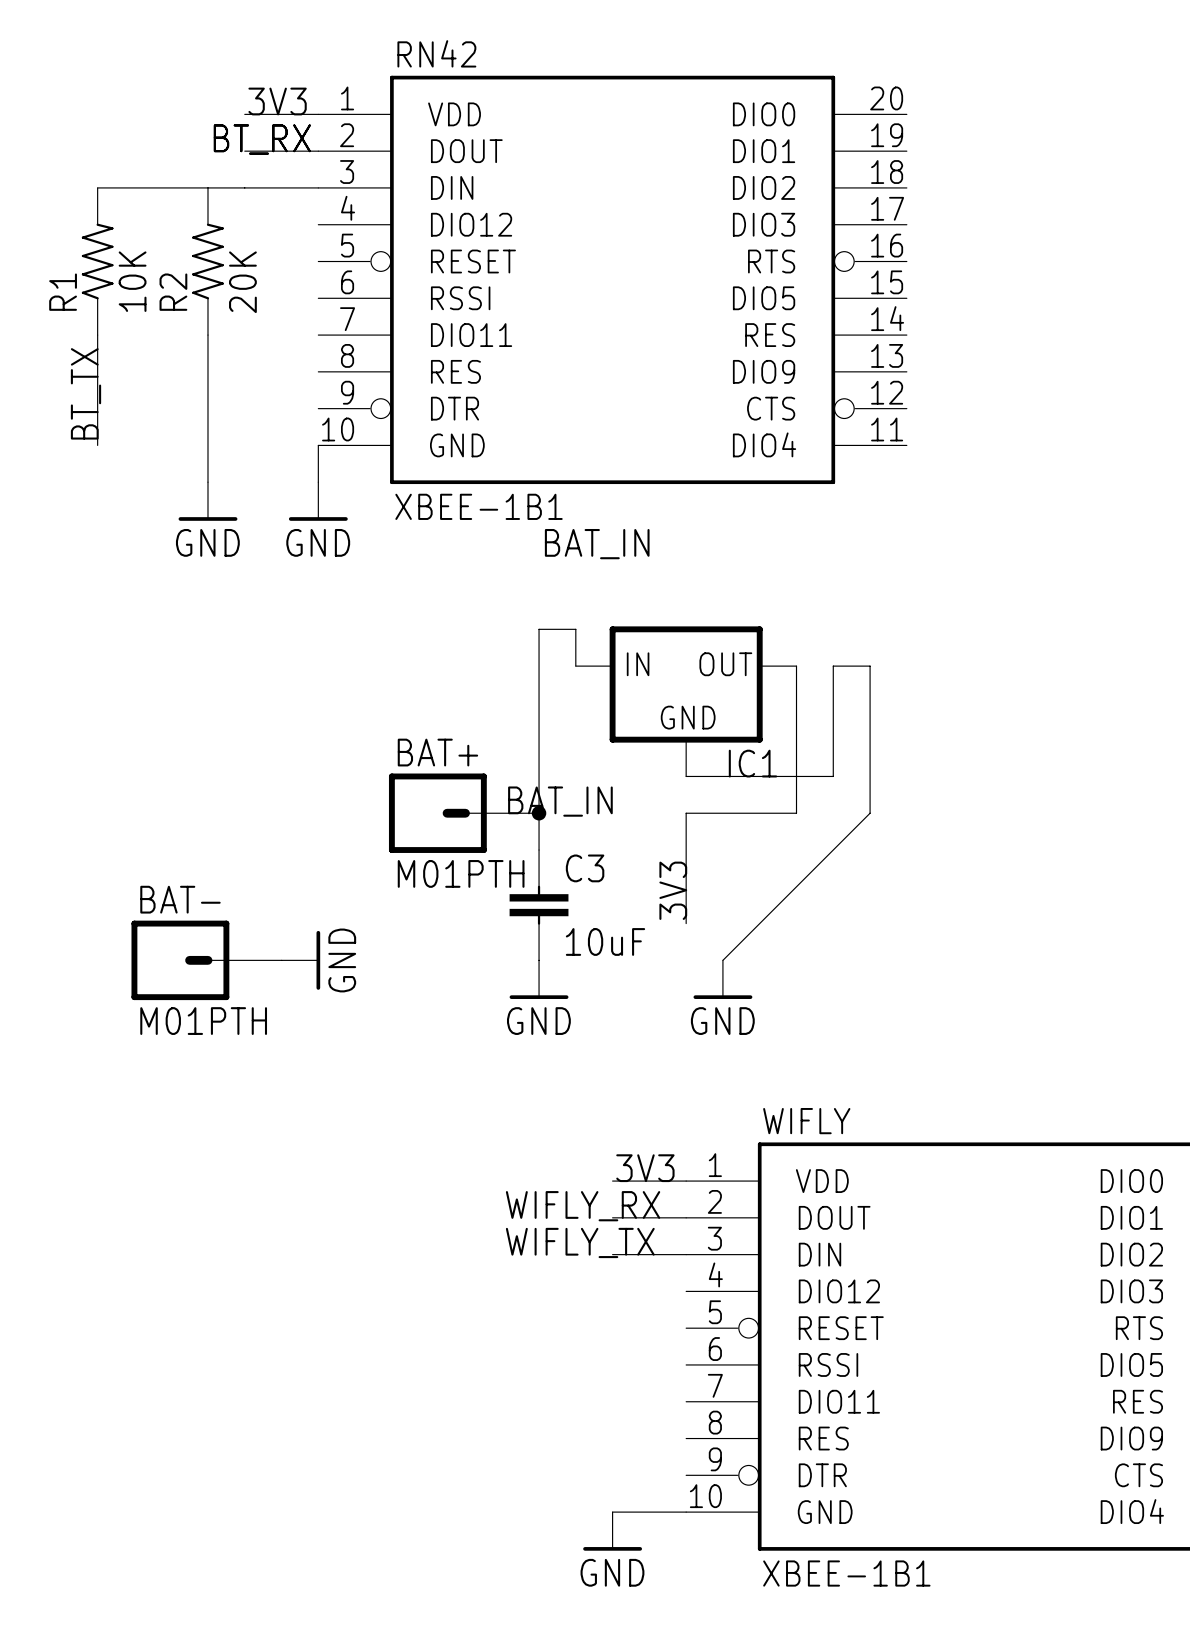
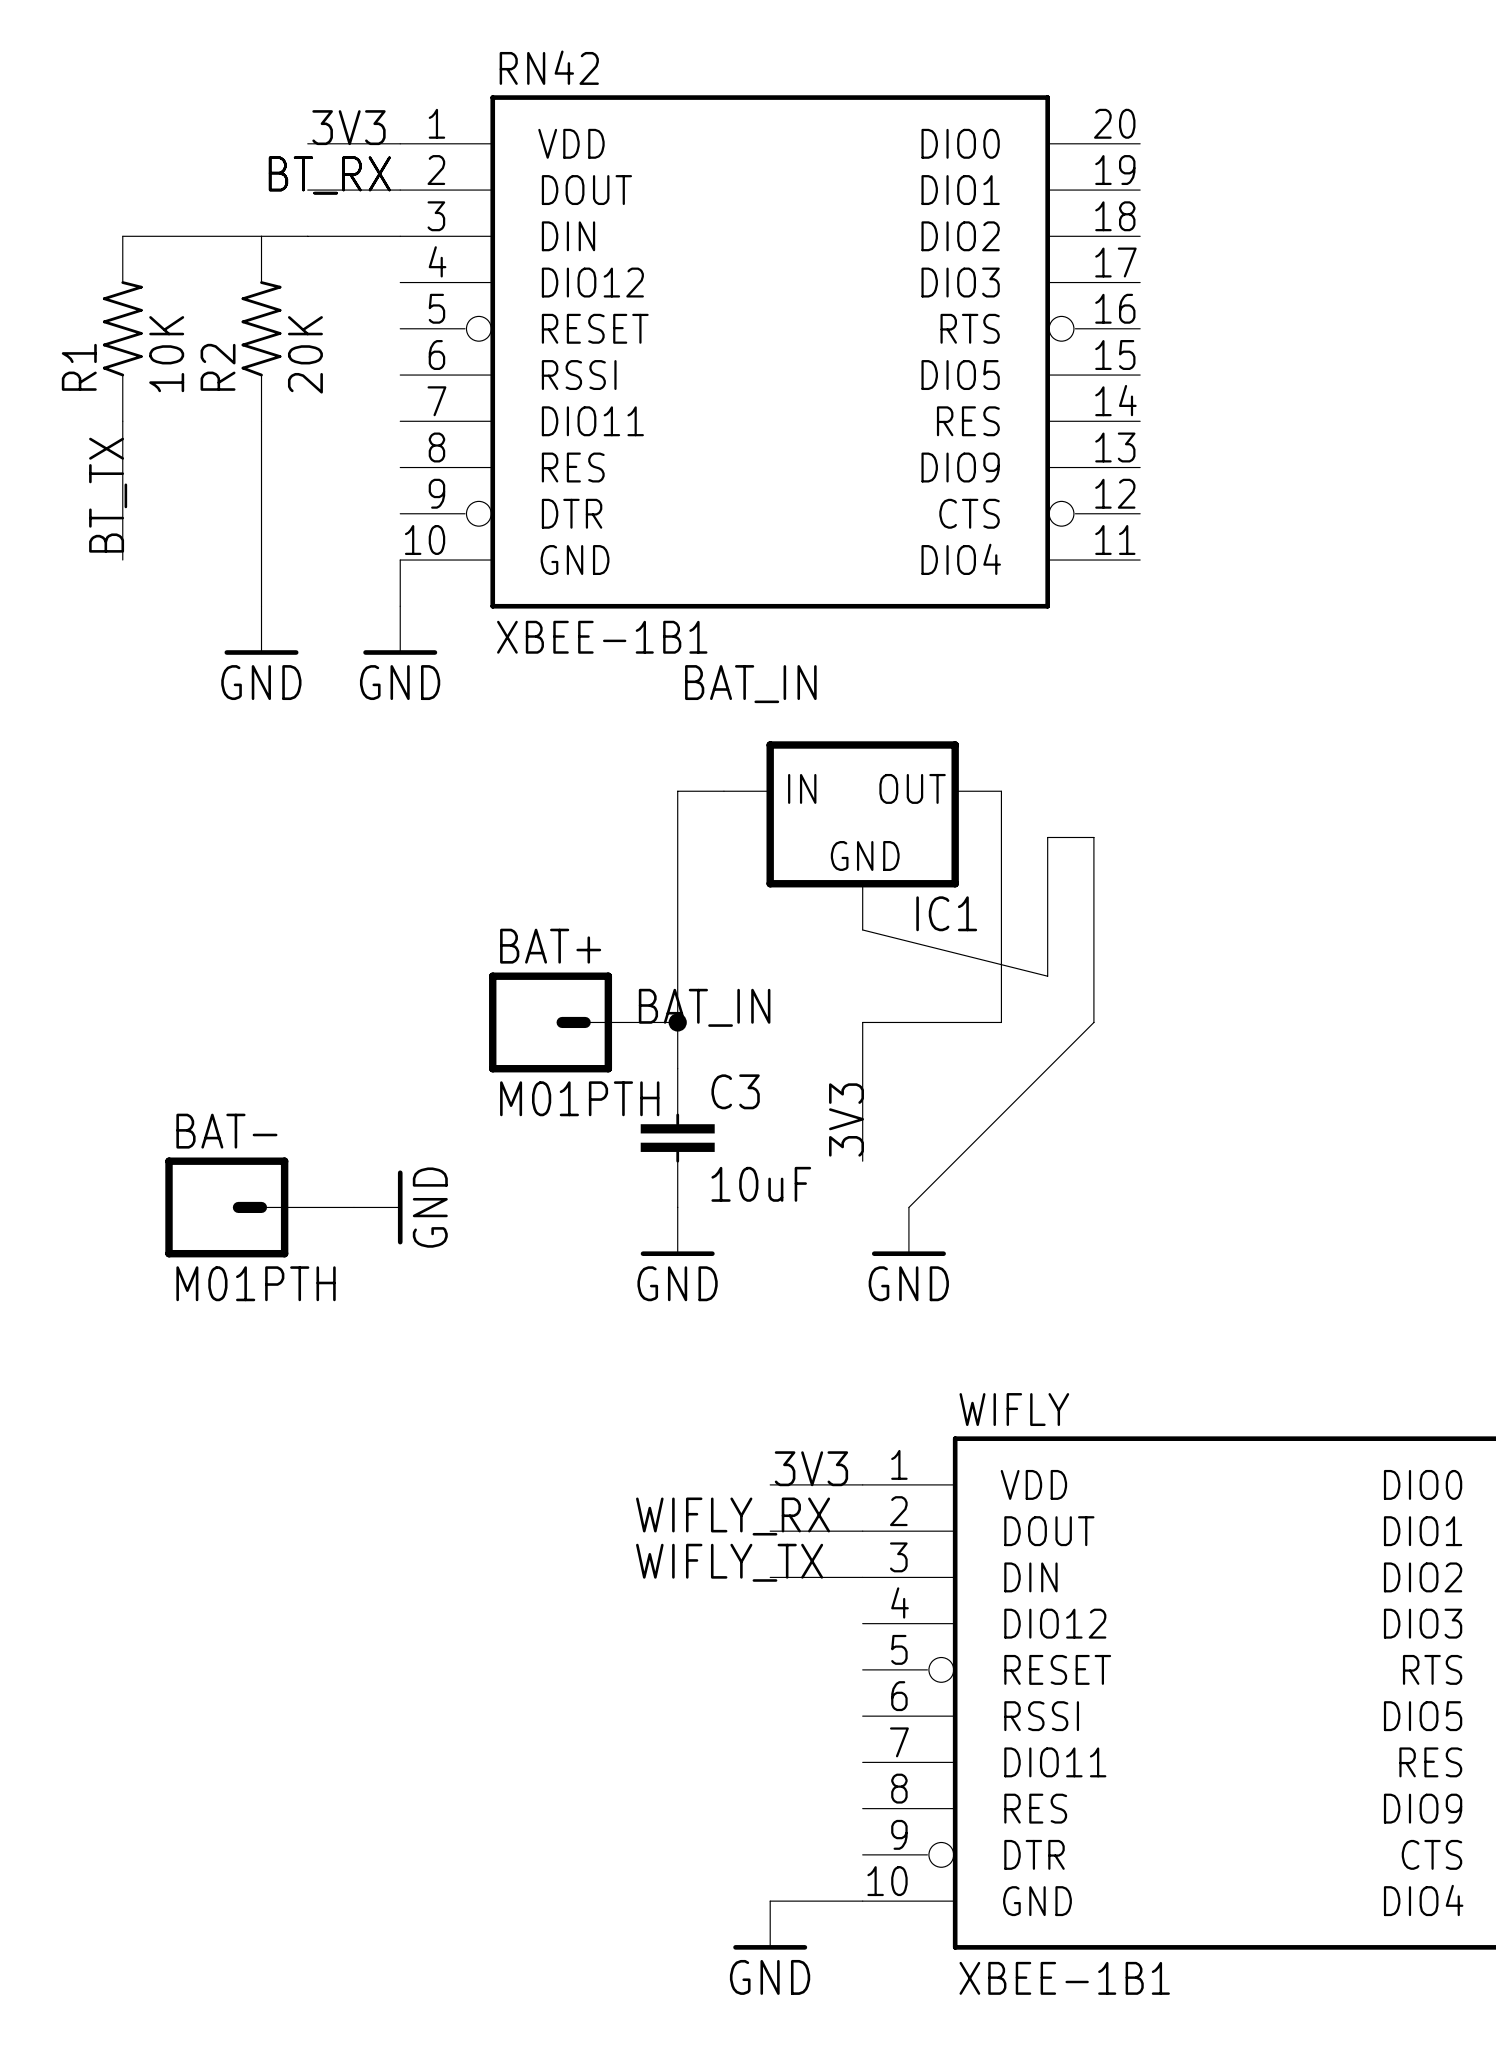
wire: (575, 629) (575, 666) -> (1001, 791) (1001, 837)
IC1 position: (686, 701) -> (862, 835)
wire: (686, 776) (833, 776) -> (862, 929) (1047, 976)

